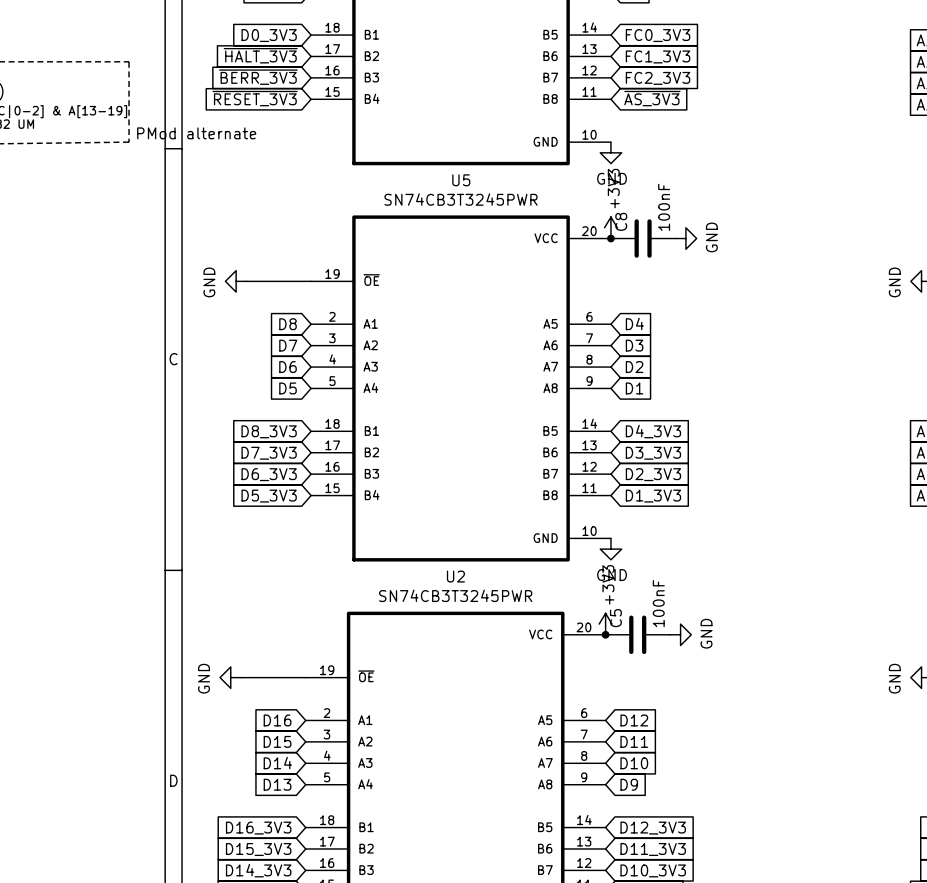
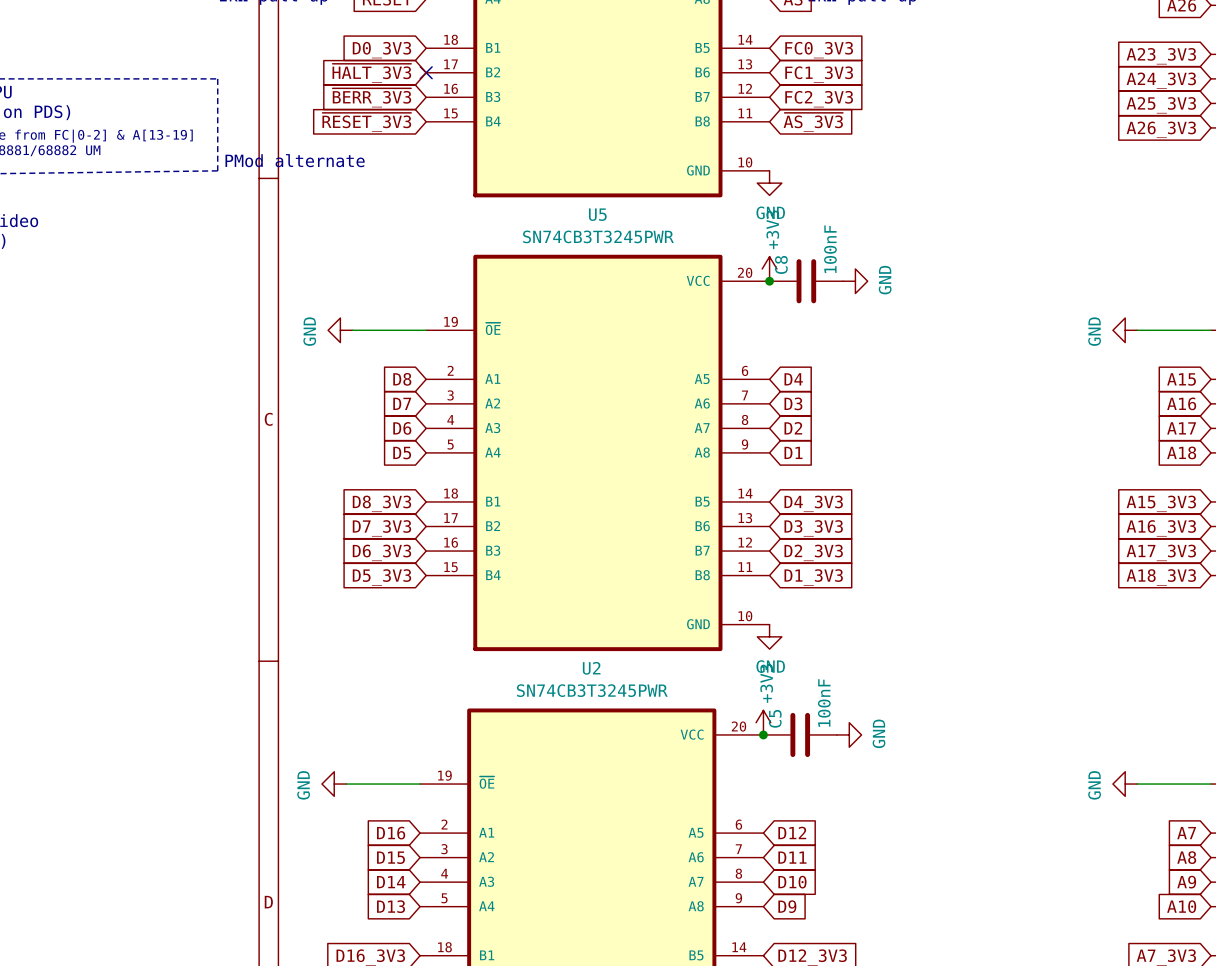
no-connect mark: none -> (426, 72)

